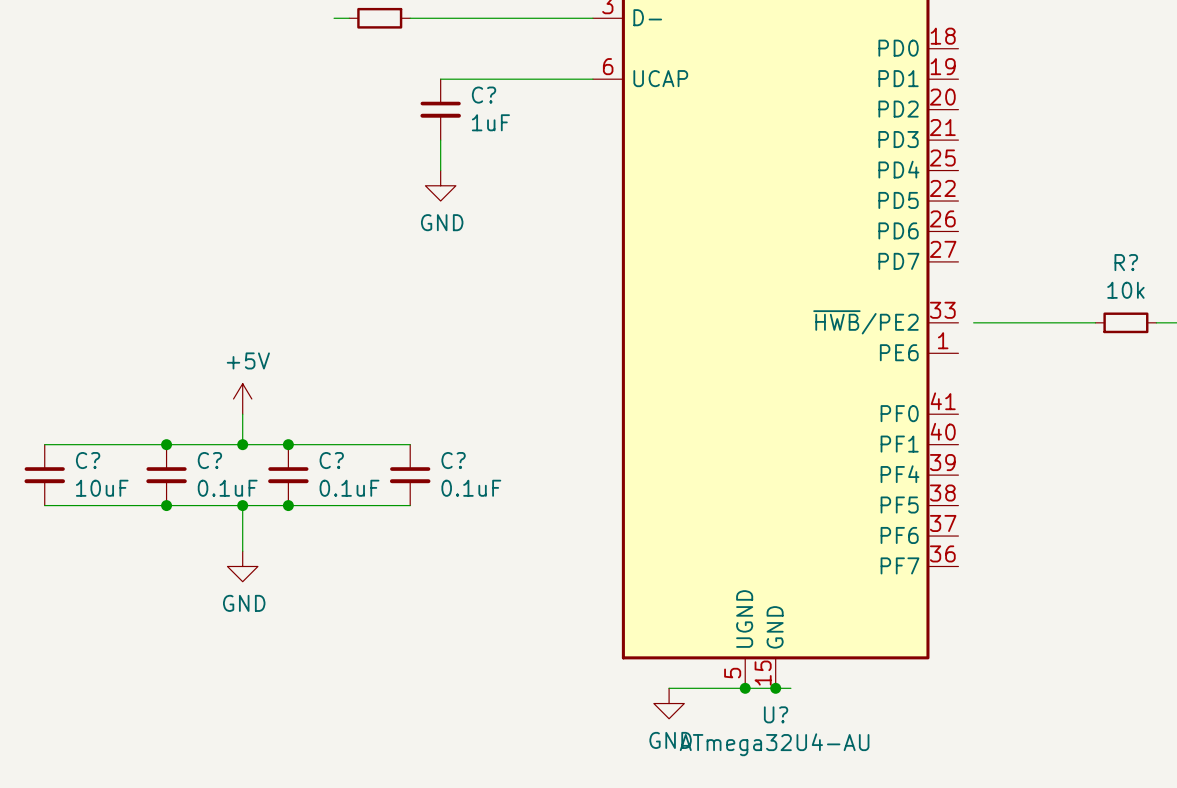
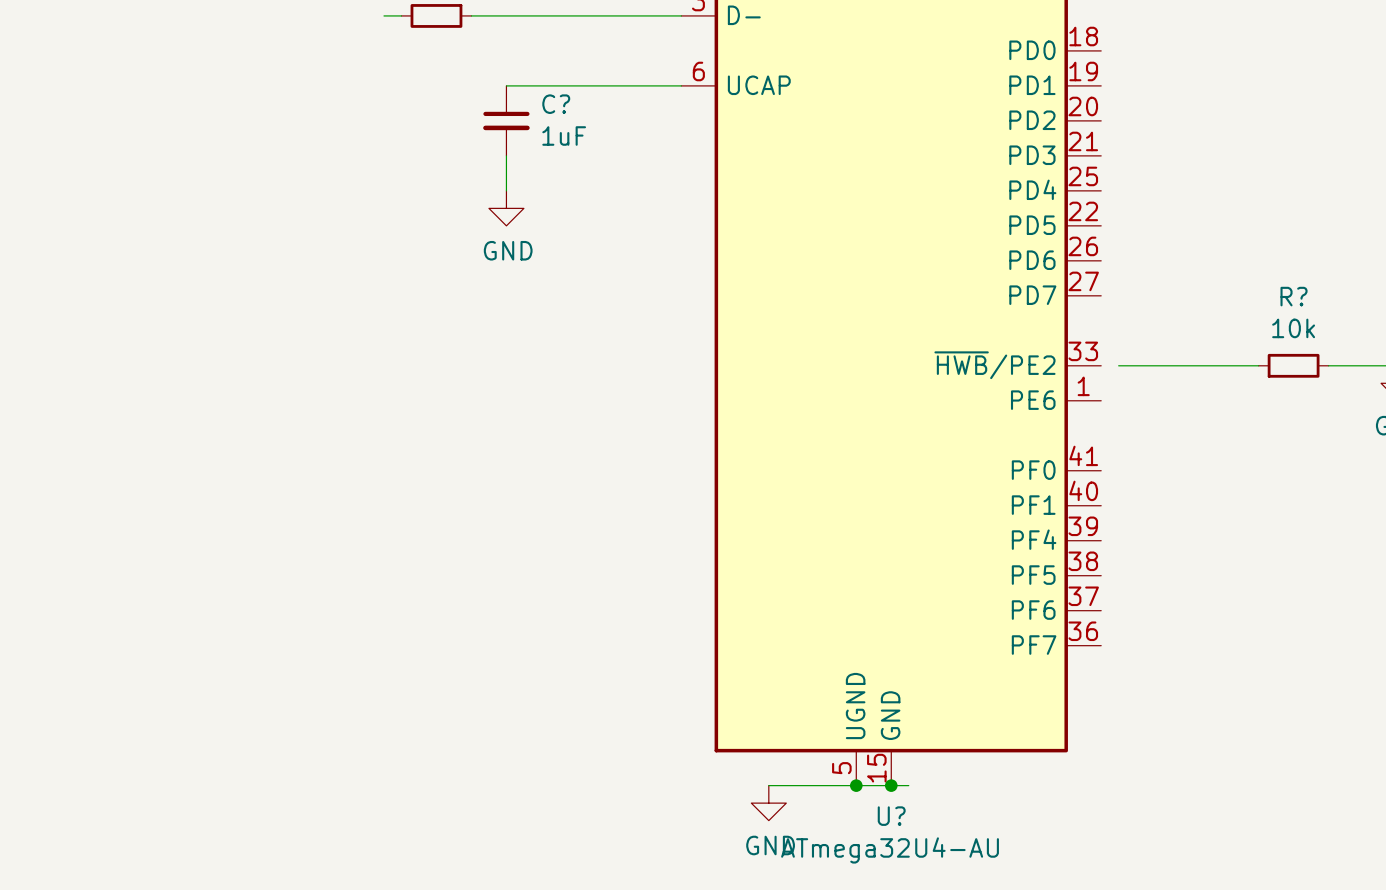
power symbol: +5V (242, 398) -> none
wire: (242, 414) (242, 444) -> none
wire: (44, 444) (410, 444) -> none
junction: (166, 444) -> none
junction: (242, 444) -> none
junction: (288, 444) -> none
C?: 10uF (44, 475) -> none
C?: 0.1uF (166, 475) -> none
C?: 0.1uF (288, 475) -> none
C?: 0.1uF (410, 475) -> none
wire: (44, 505) (410, 505) -> none
junction: (166, 505) -> none
wire: (242, 505) (242, 551) -> none
junction: (242, 505) -> none
junction: (288, 505) -> none
power symbol: GND (242, 566) -> none

